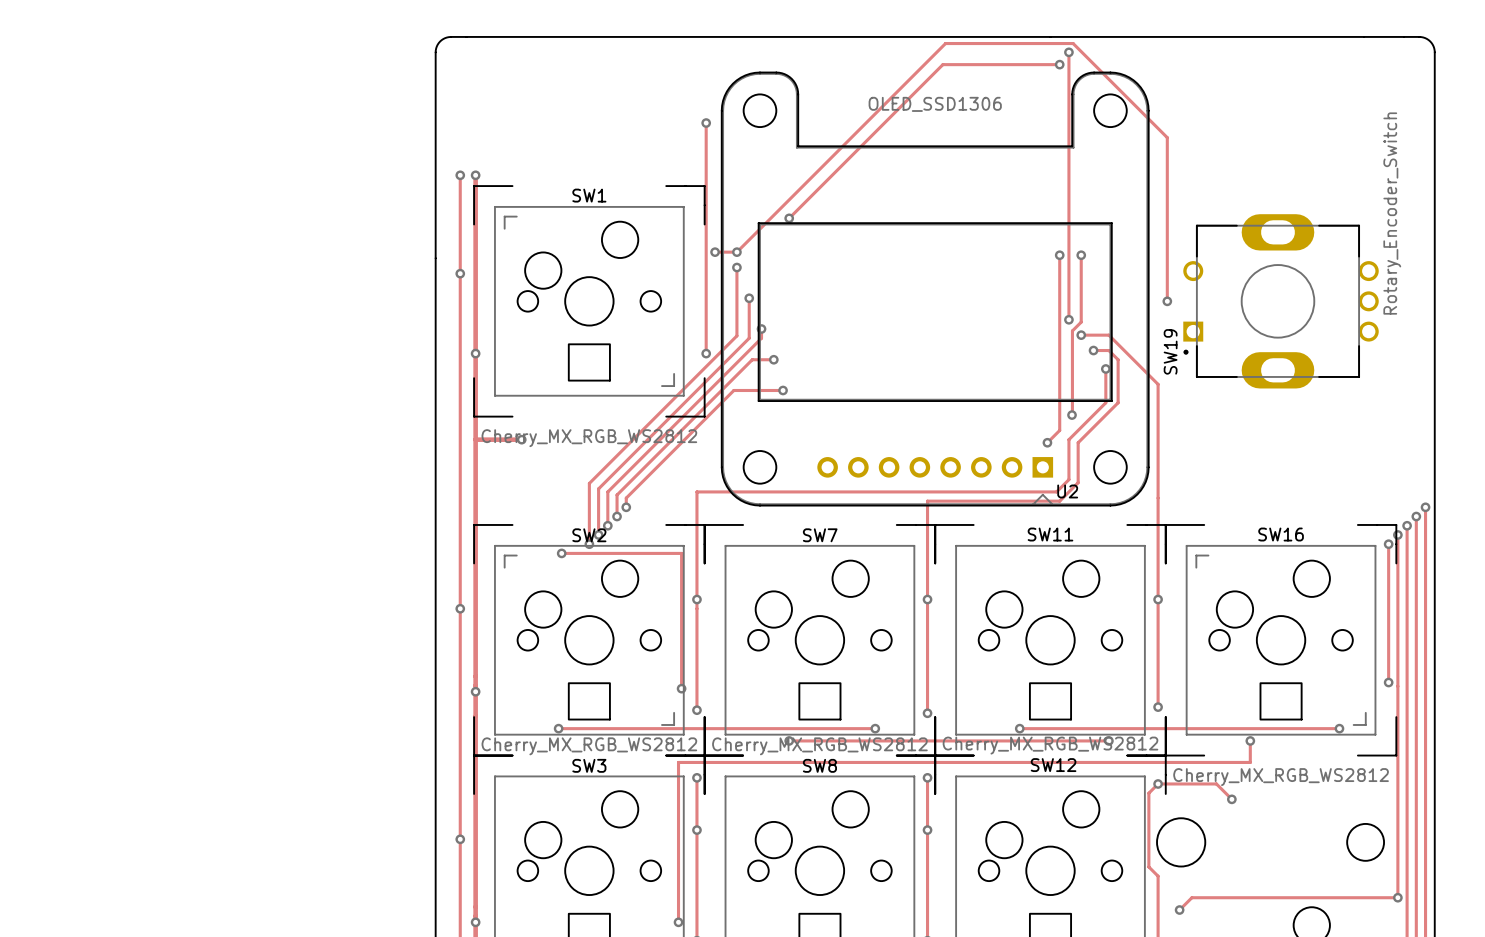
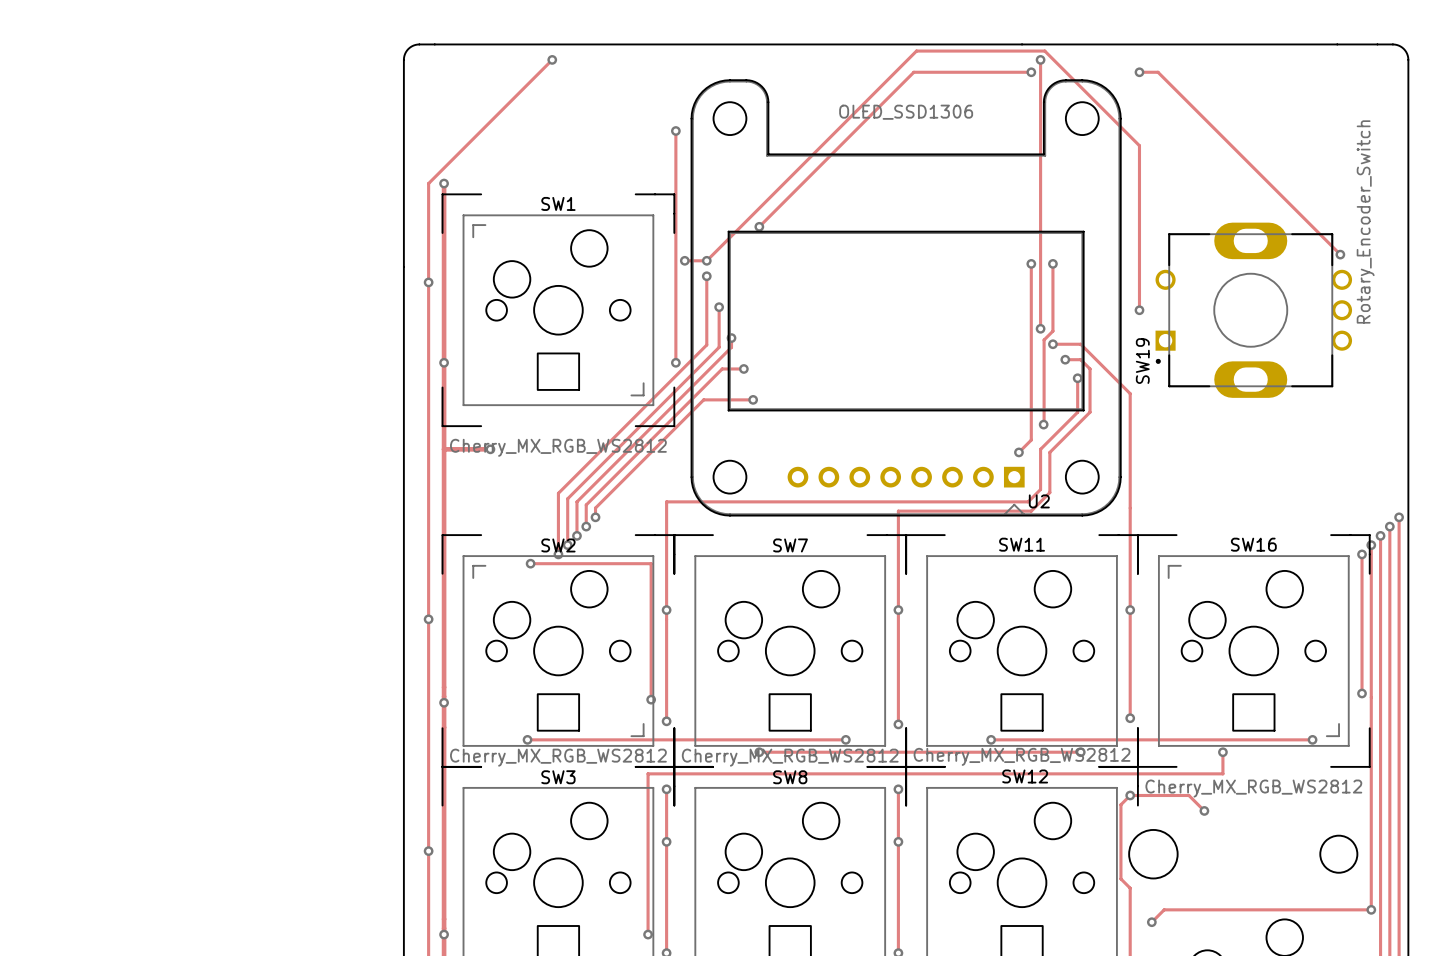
track: none -> (552, 59) (428, 183)
via: none -> (552, 59)
track: none -> (1139, 72) (1158, 72) (1340, 254)
via: none -> (1139, 72)
via: (460, 175) -> none
via: none -> (1340, 254)

